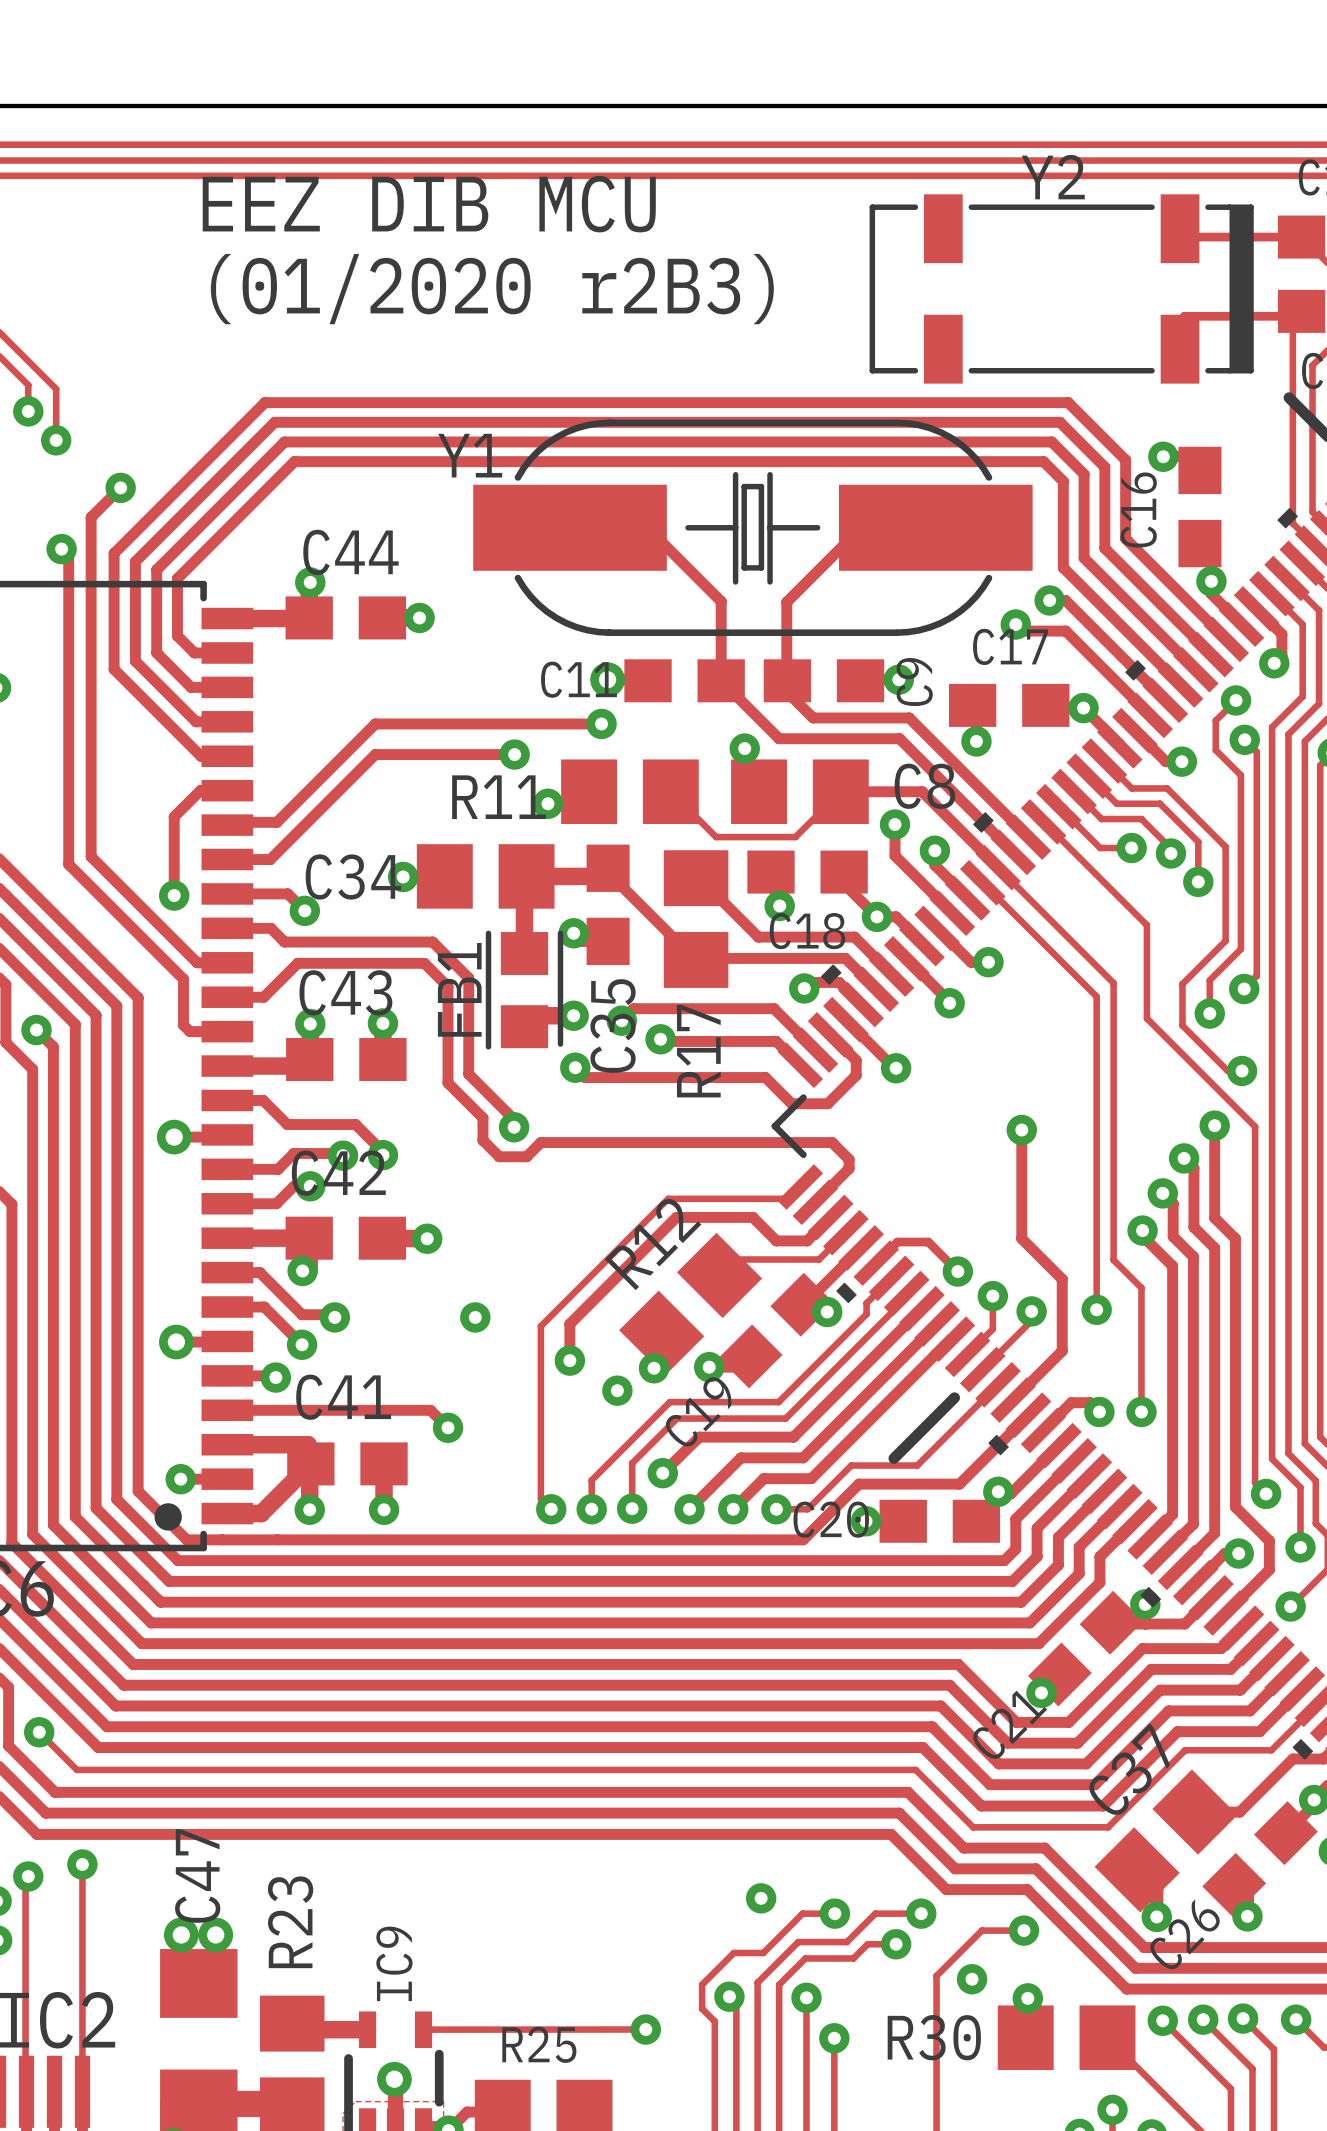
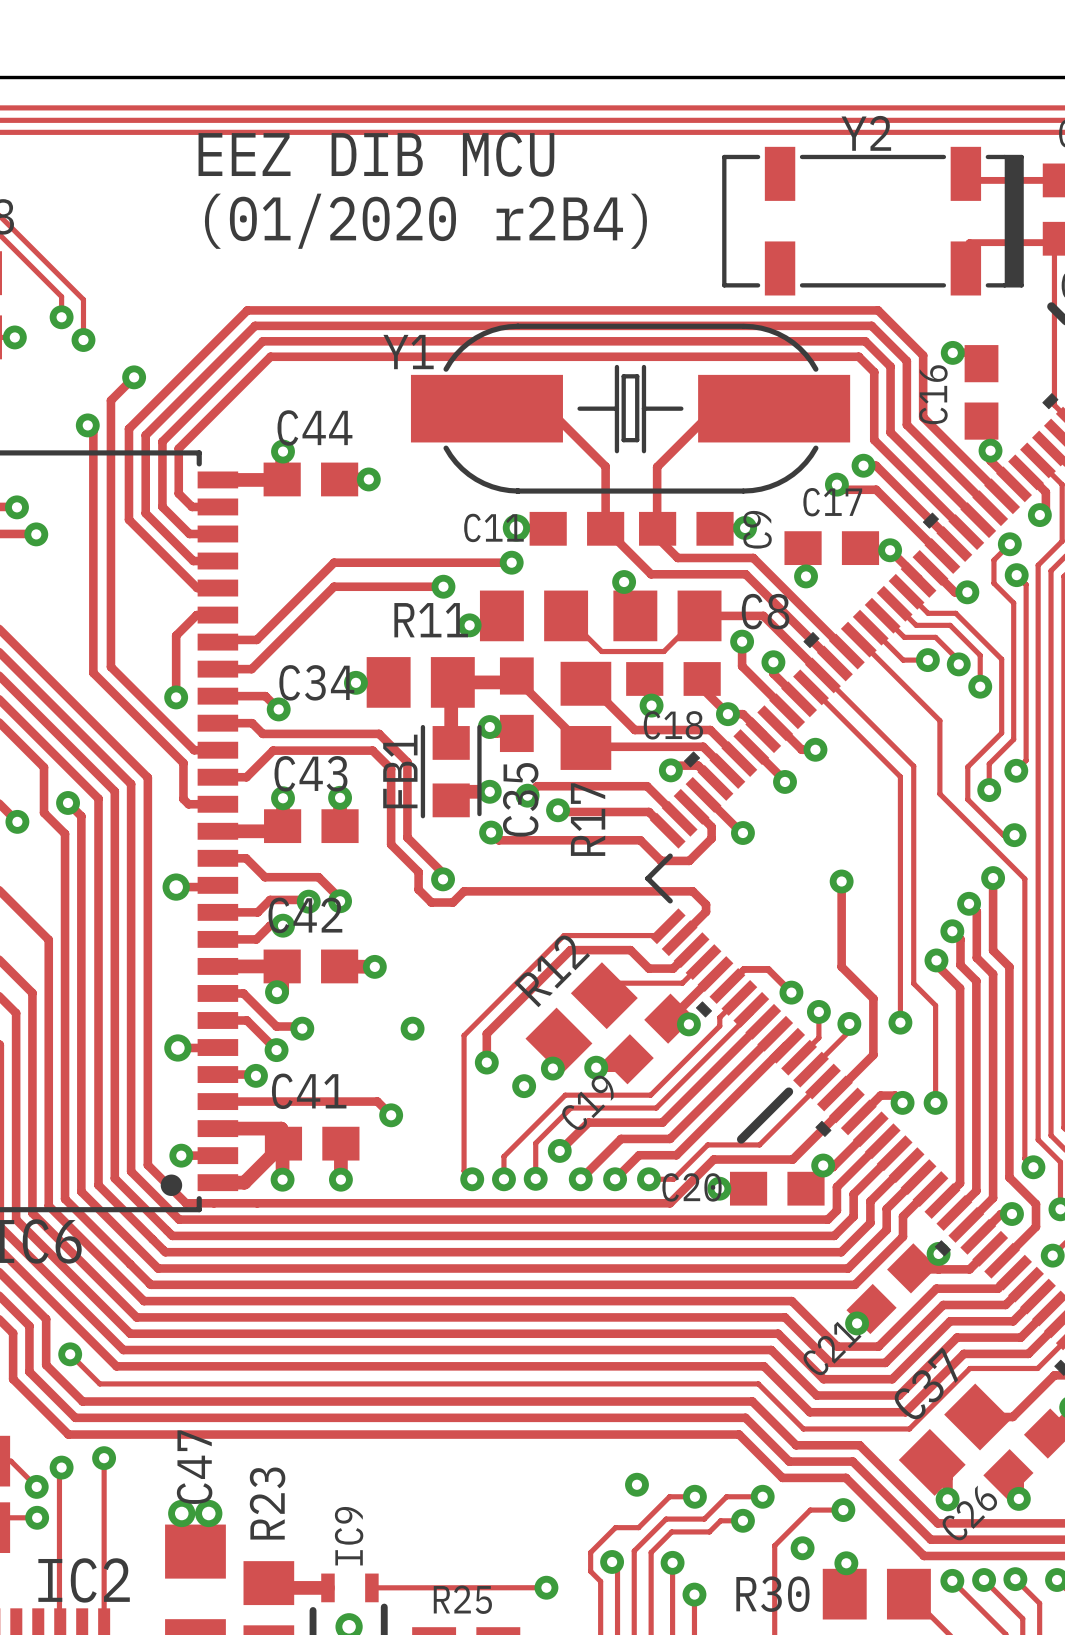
text: (01/2020 r2B3) (492, 289) -> (01/2020 r2B4) (425, 221)

